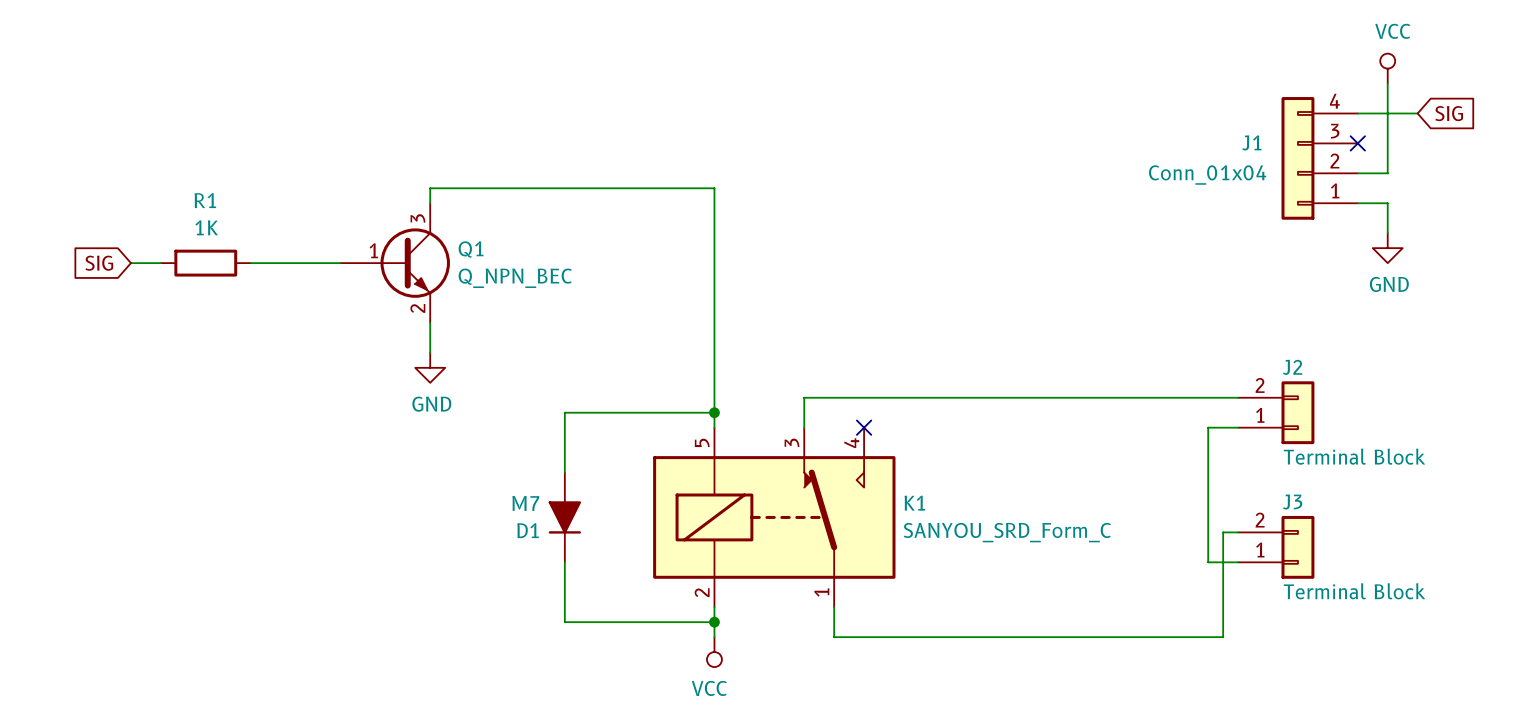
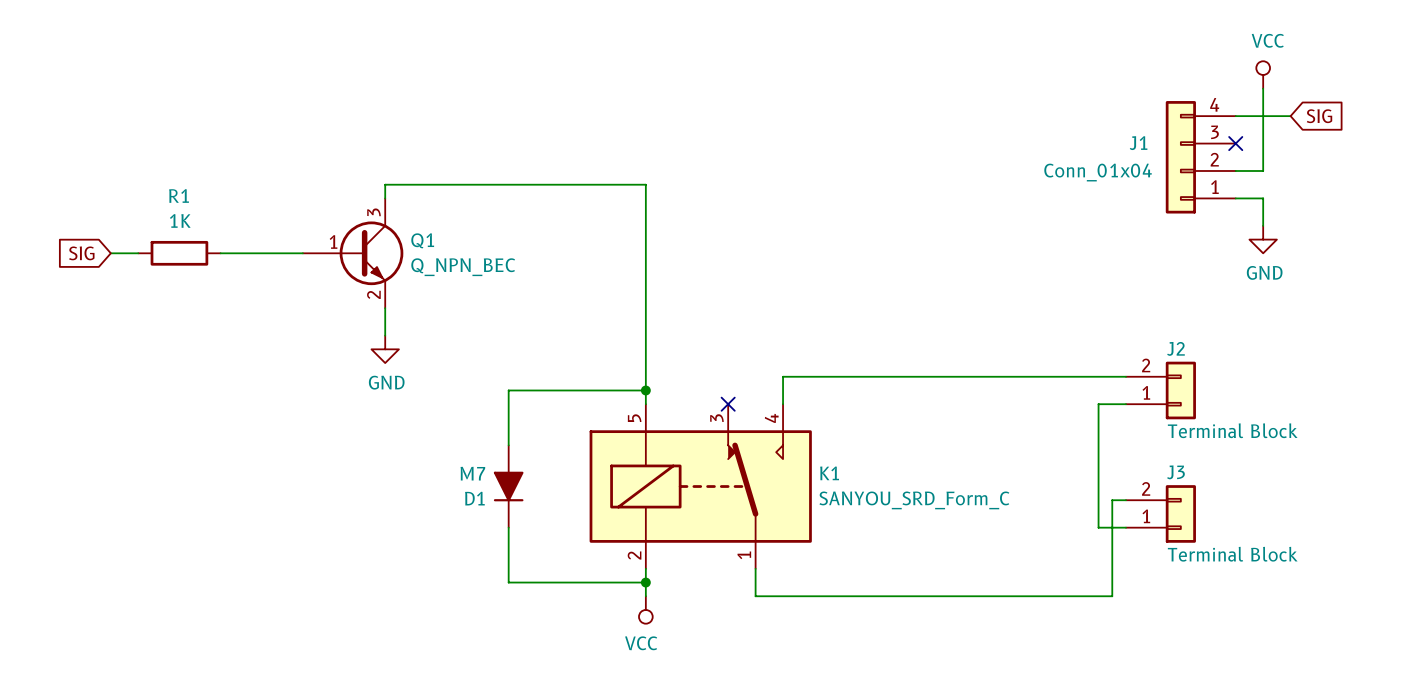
wire: (864, 397) (804, 397) (804, 427) -> (783, 376) (783, 404)
no-connect mark position: (864, 427) -> (728, 404)

